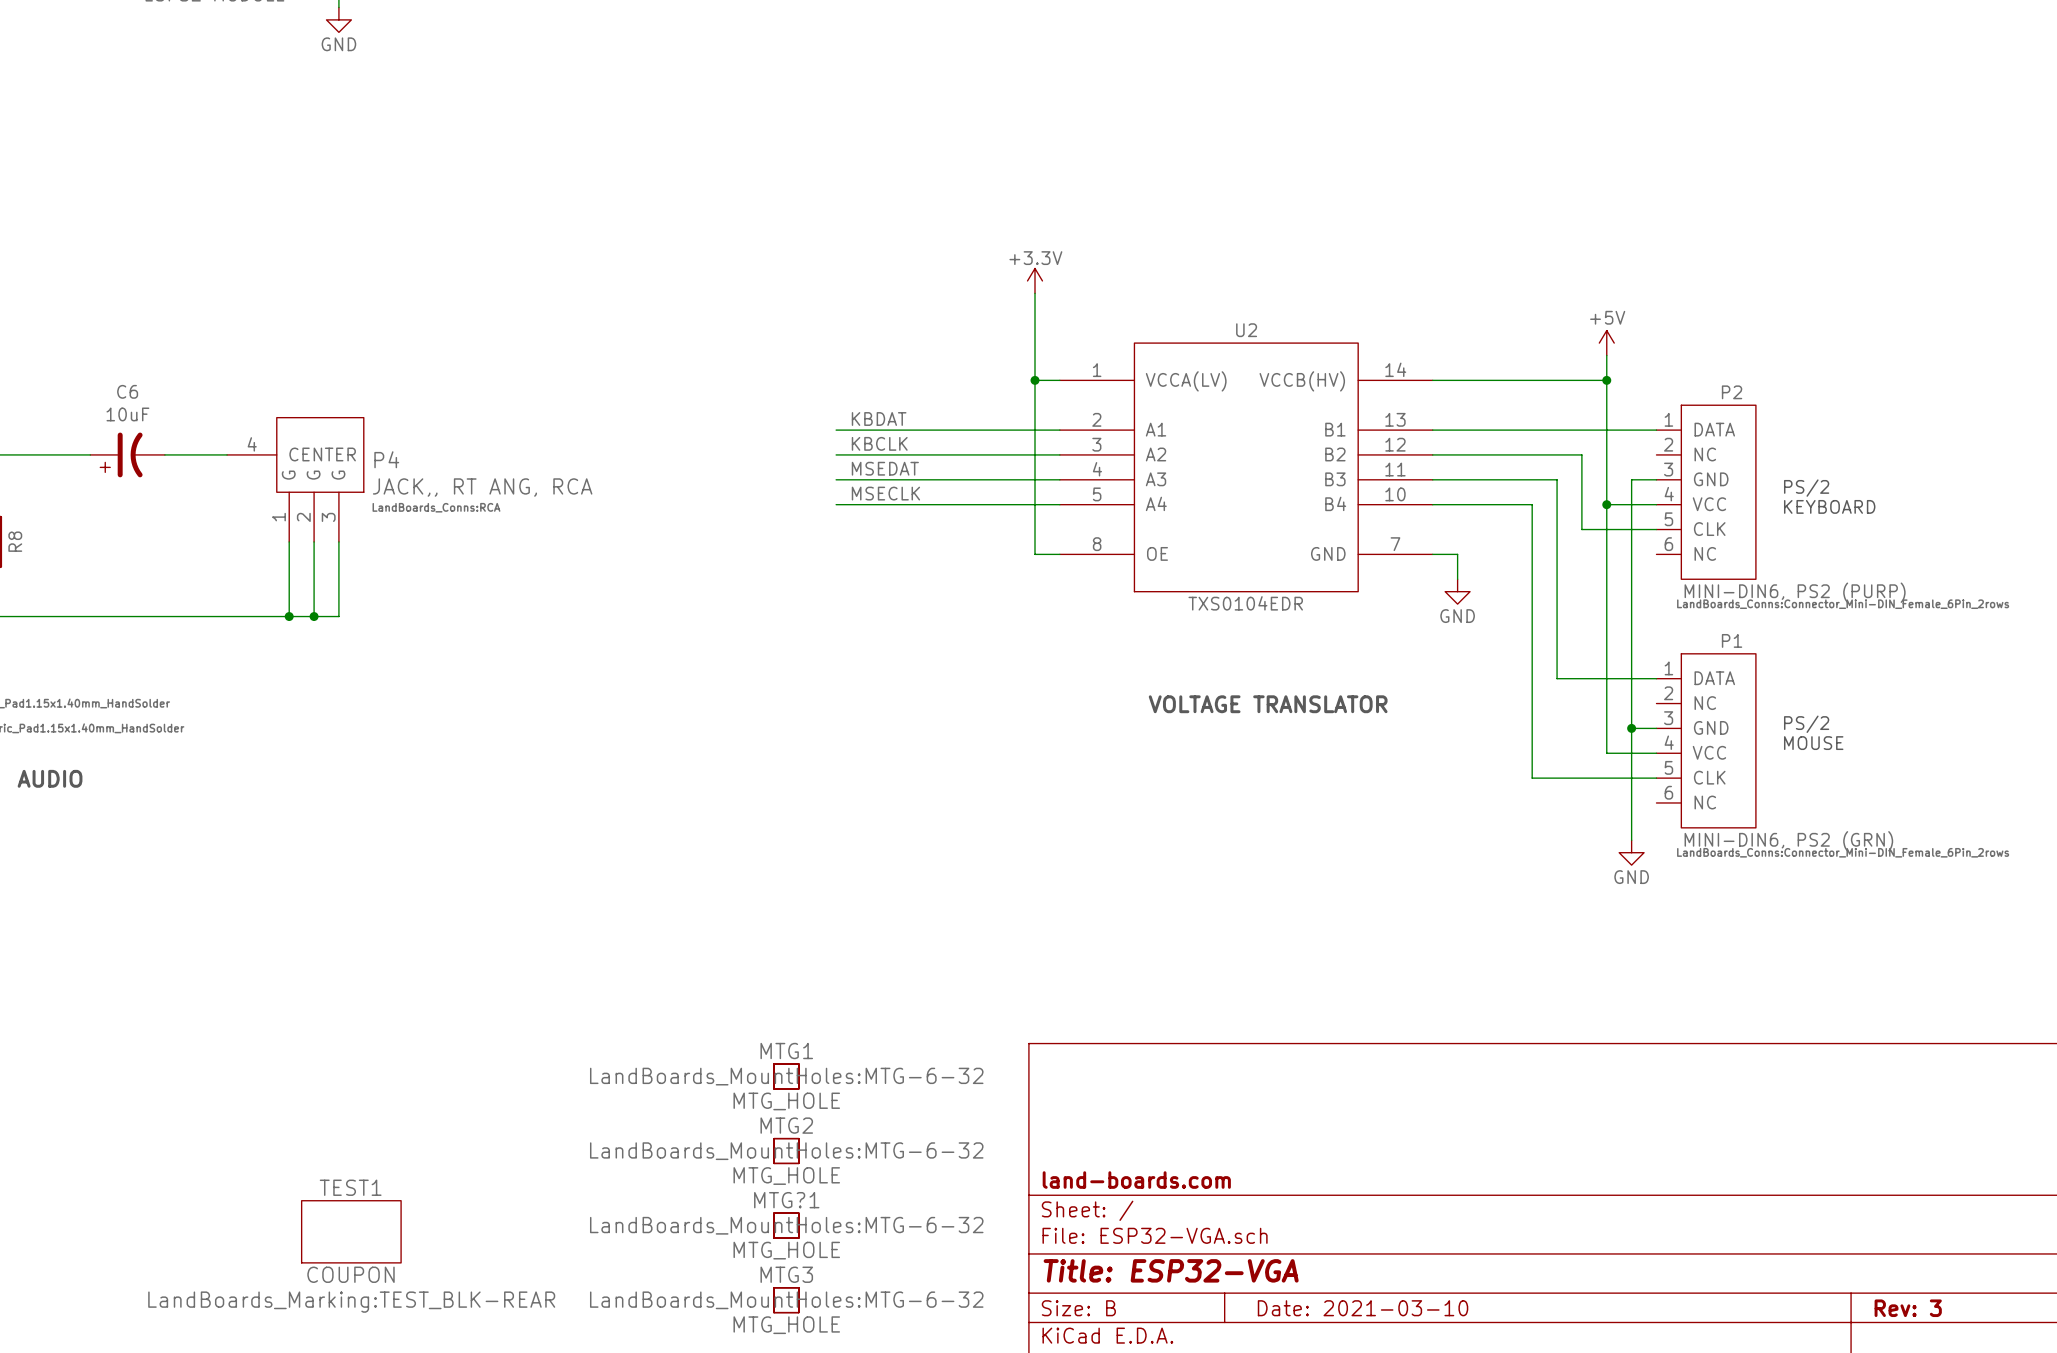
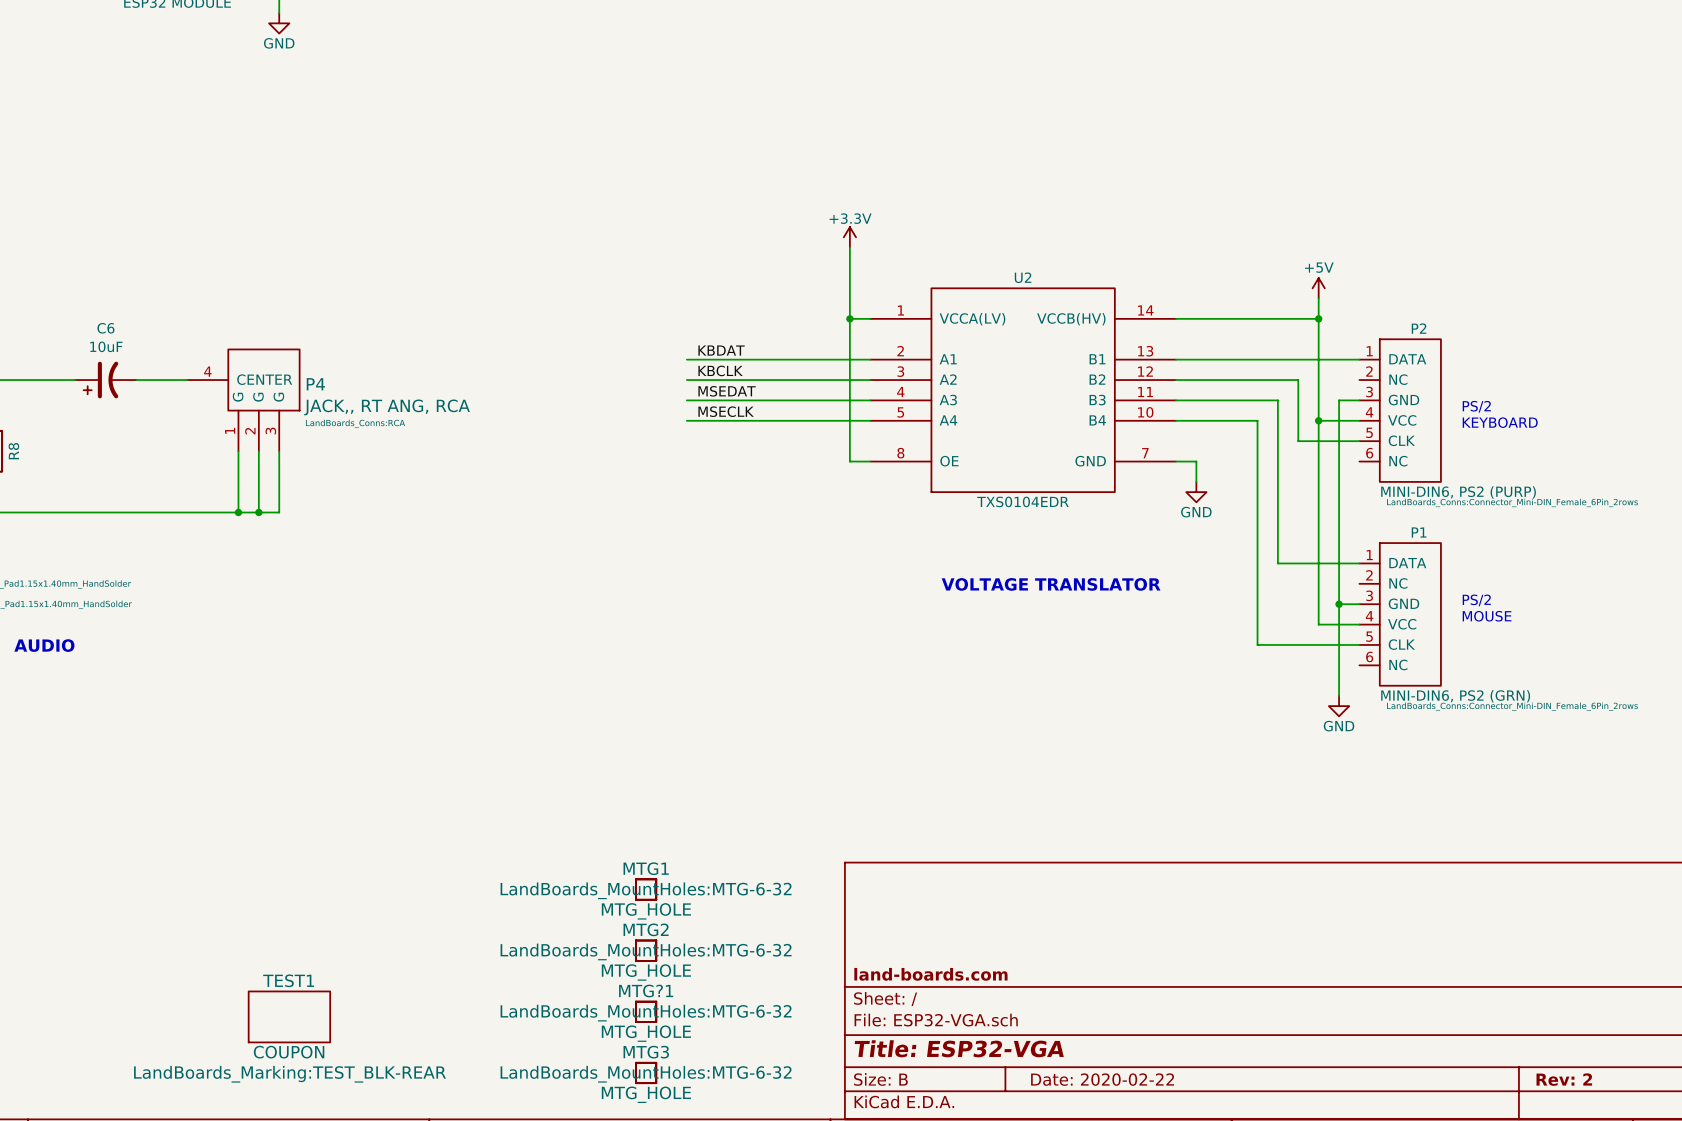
title block: Date: 2021-03-10 (1363, 1308) -> Date: 2020-02-22 (1102, 1079)
title block: Rev: 3 (1908, 1308) -> Rev: 2 (1564, 1079)

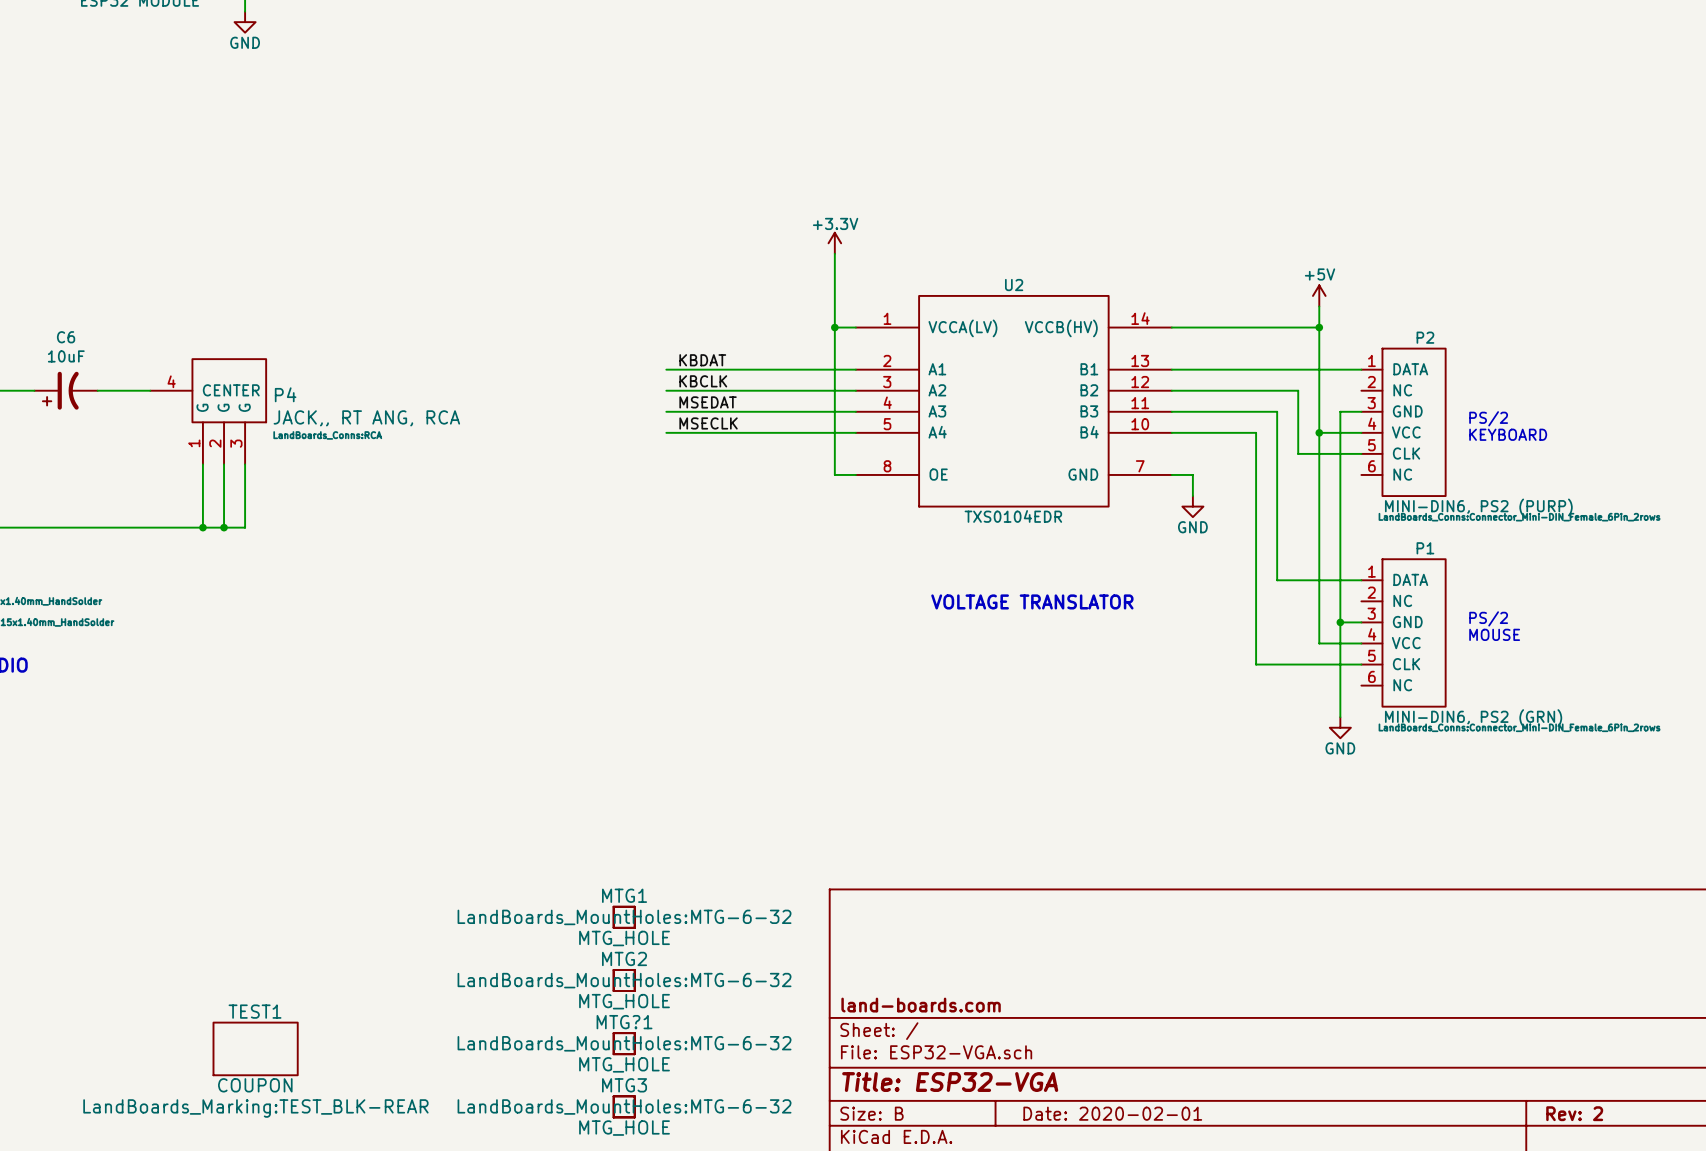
title block: Date: 2020-02-22 (1102, 1079) -> Date: 2020-02-01 (1112, 1113)

